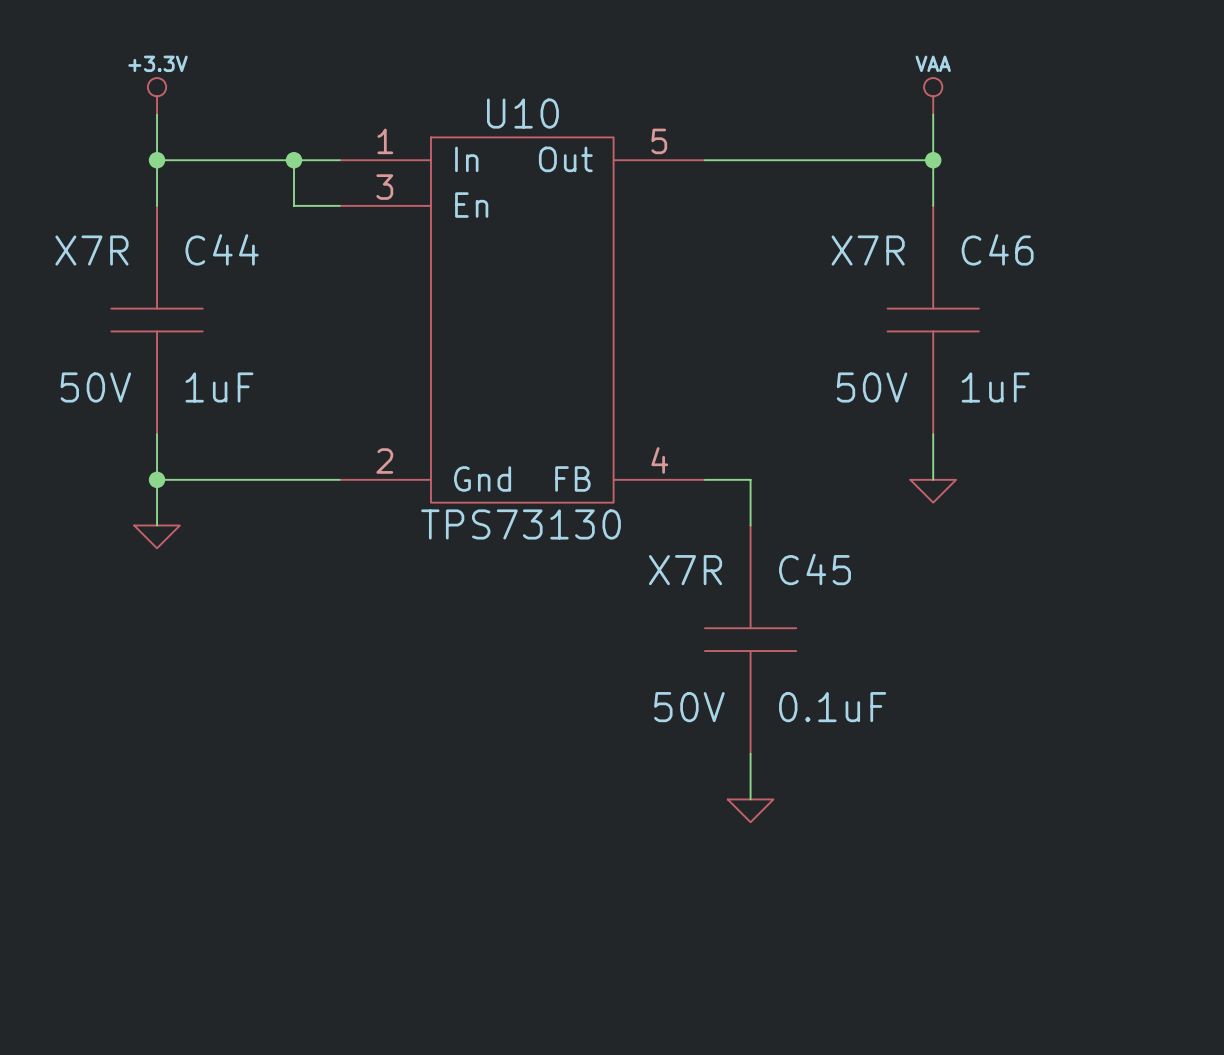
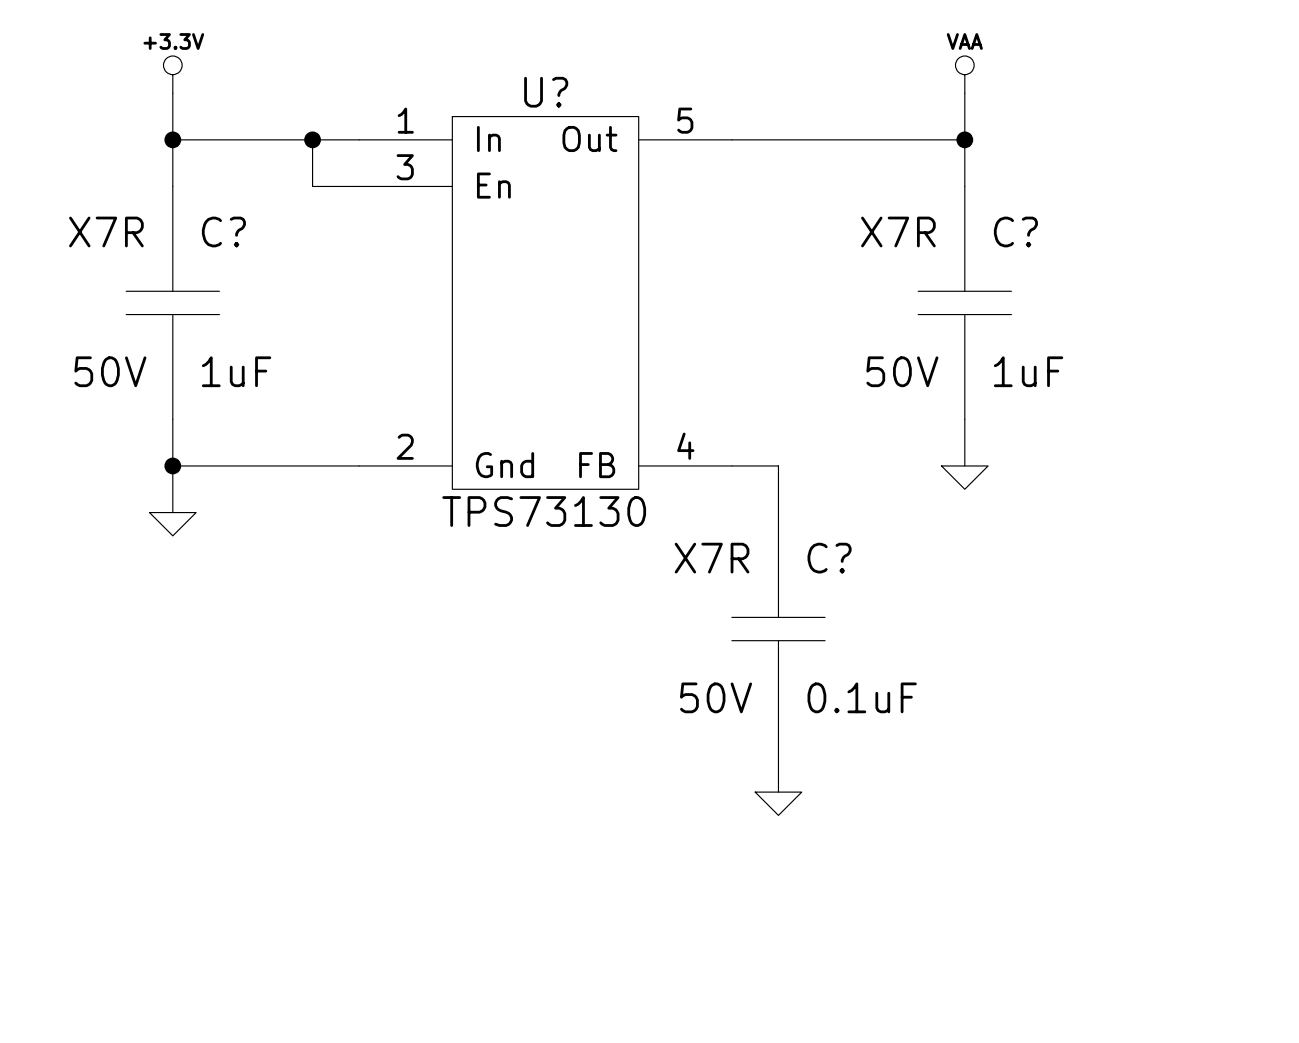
U10 name: U10 (522, 113) -> U? (546, 92)
C44 name: C44 (222, 249) -> C? (223, 231)
C46 name: C46 (997, 249) -> C? (1015, 231)
C45 name: C45 (815, 569) -> C? (829, 558)

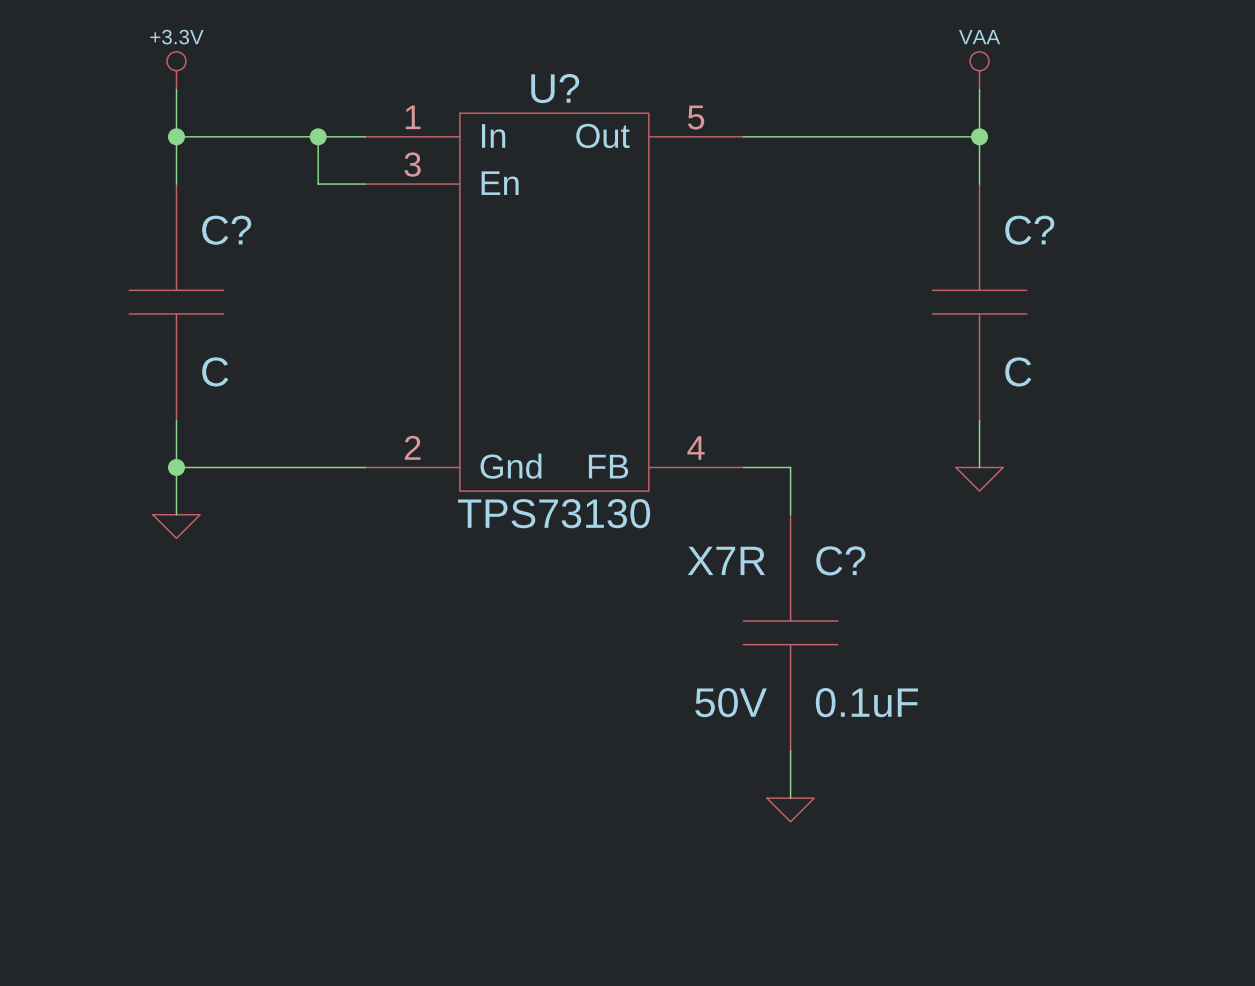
C? text: X7R (106, 231) -> none
C? text: X7R (898, 231) -> none
C? text: 50V (110, 371) -> none
C? value: 1uF (236, 371) -> C (215, 371)
C? text: 50V (902, 371) -> none
C? value: 1uF (1028, 371) -> C (1018, 371)

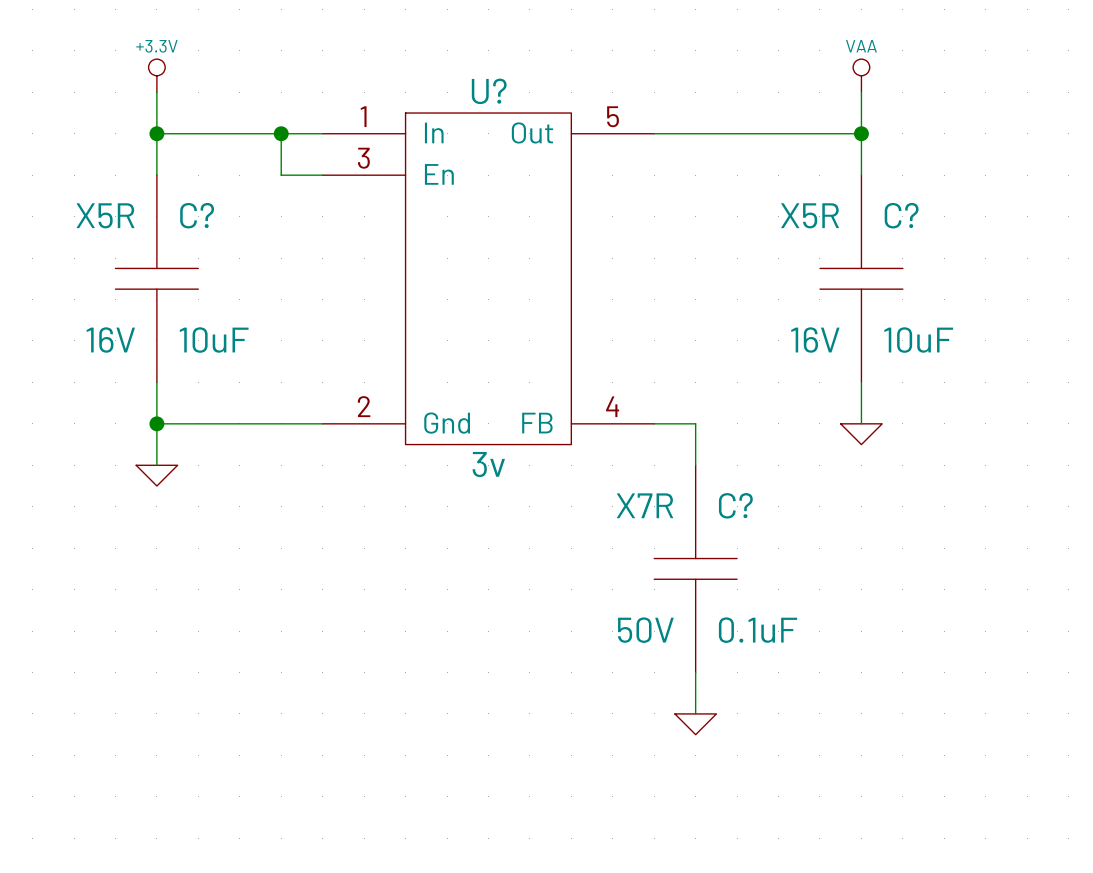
C? text: none -> X5R (105, 215)
C? text: none -> X5R (810, 215)
C? text: none -> 16V (110, 340)
C? value: C (215, 371) -> 10uF (214, 340)
C? text: none -> 16V (815, 340)
C? value: C (1018, 371) -> 10uF (918, 340)
U? value: TPS73130 (554, 513) -> 3v (488, 464)

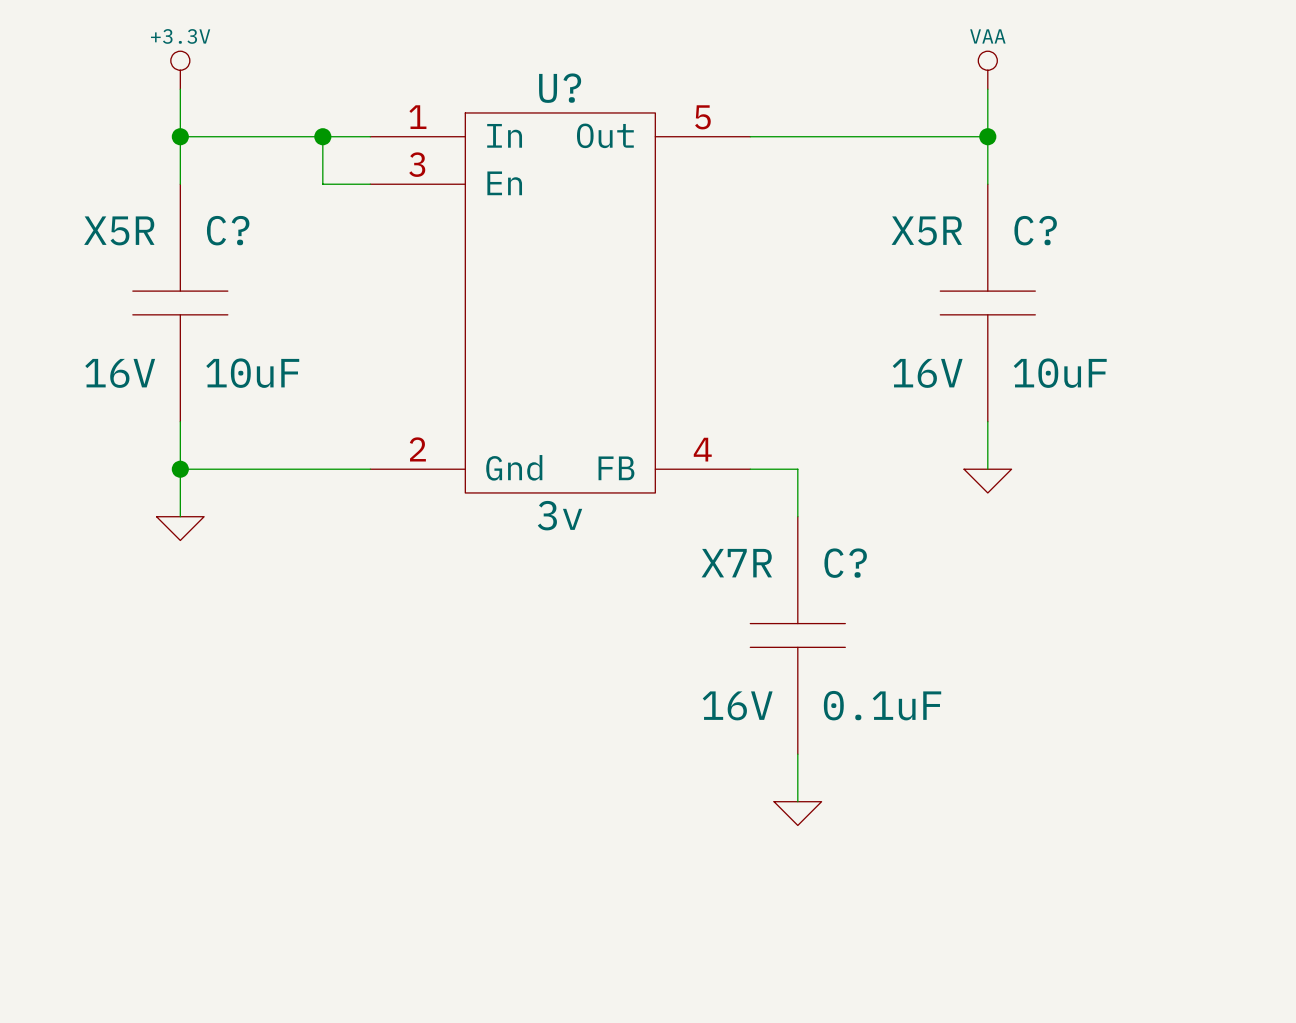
C? text: 50V (645, 630) -> 16V (737, 705)

